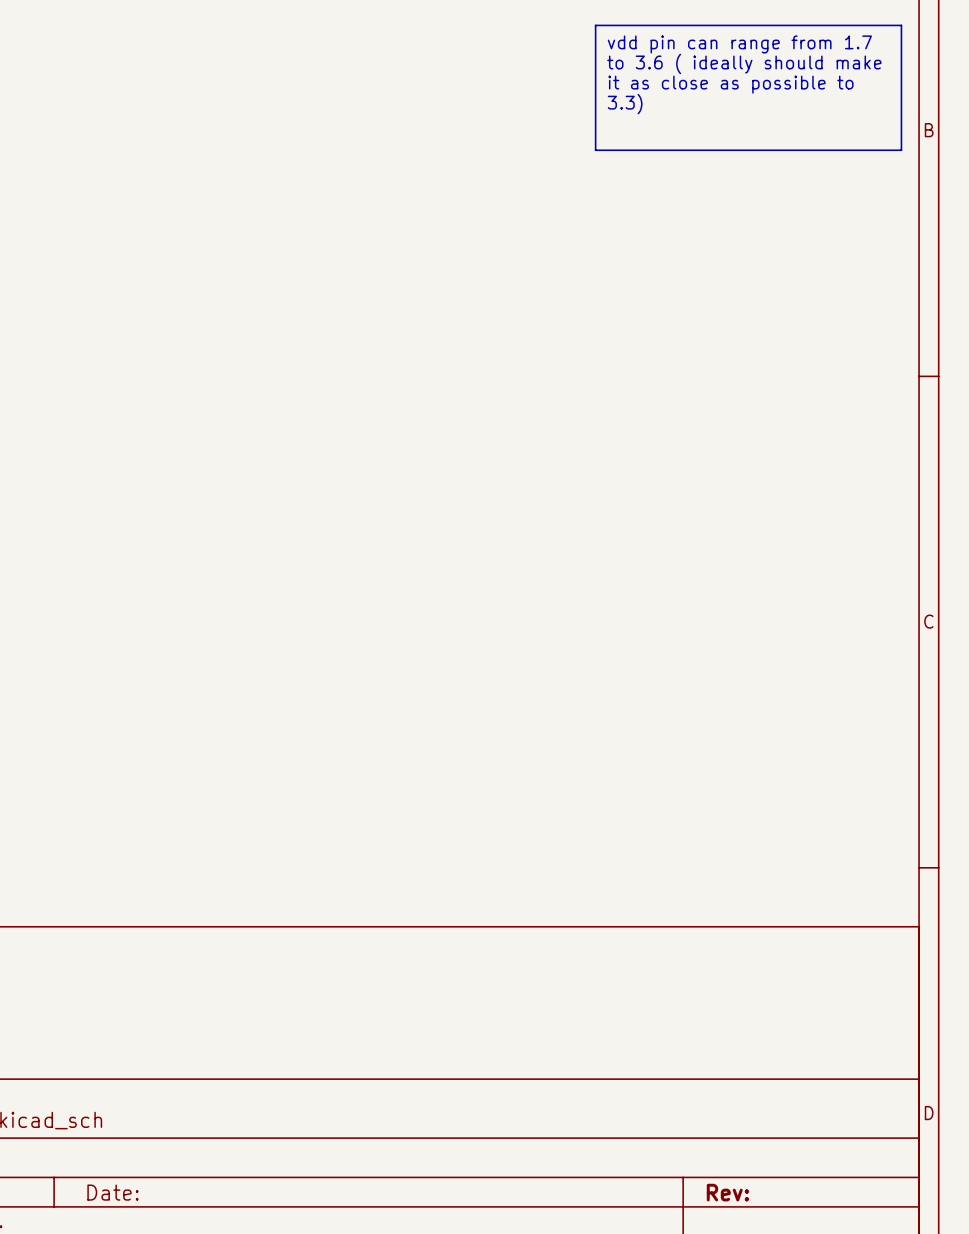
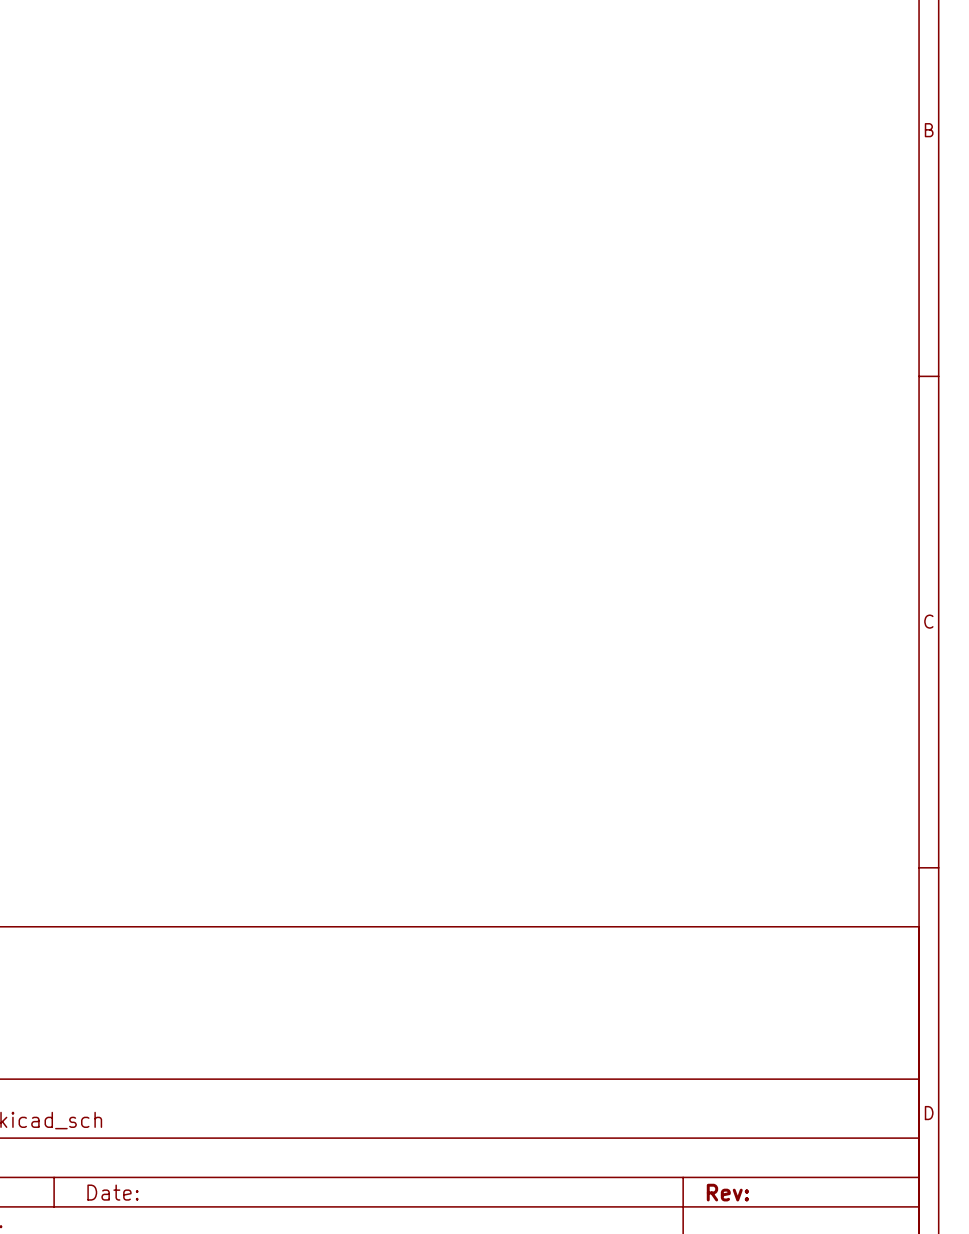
line: (595, 25) (901, 25) (901, 150) (595, 150) (595, 25) -> none
text: vdd pin can range from 1.7 (739, 44) -> none
text: to 3.6 ( ideally should make (744, 63) -> none
text: it as close as possible to (730, 84) -> none
text: 3.3) (625, 104) -> none

